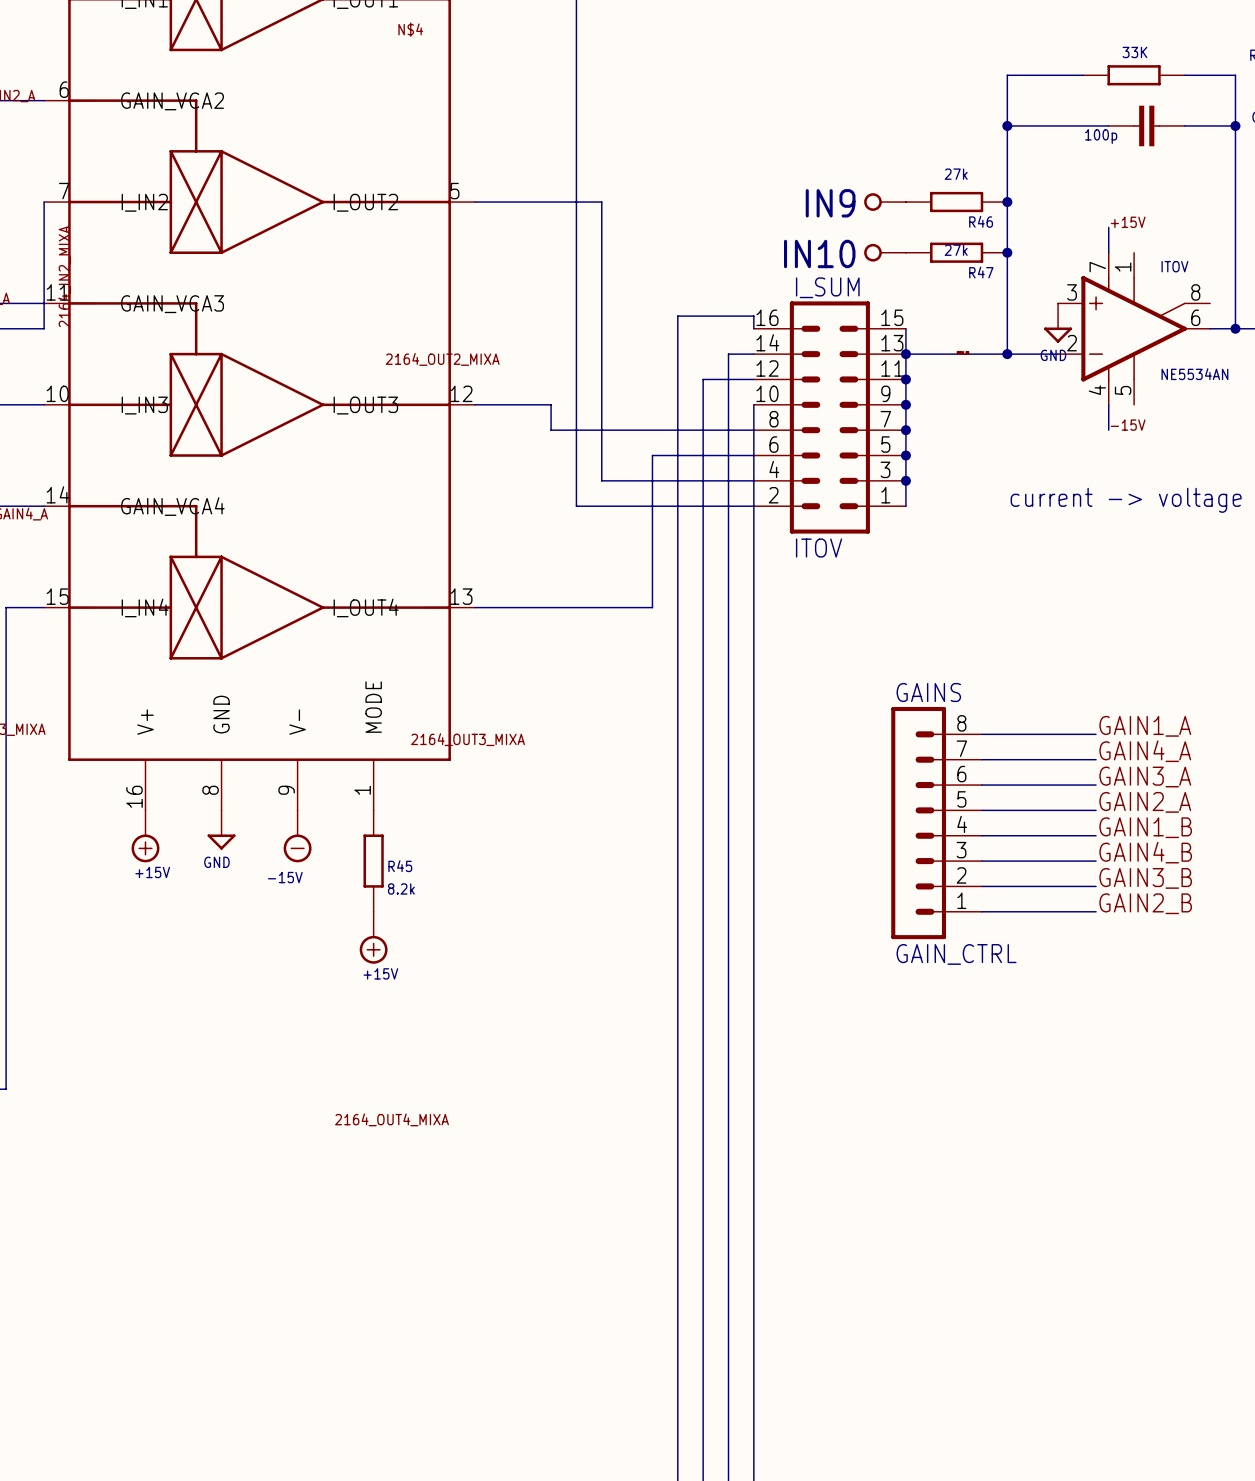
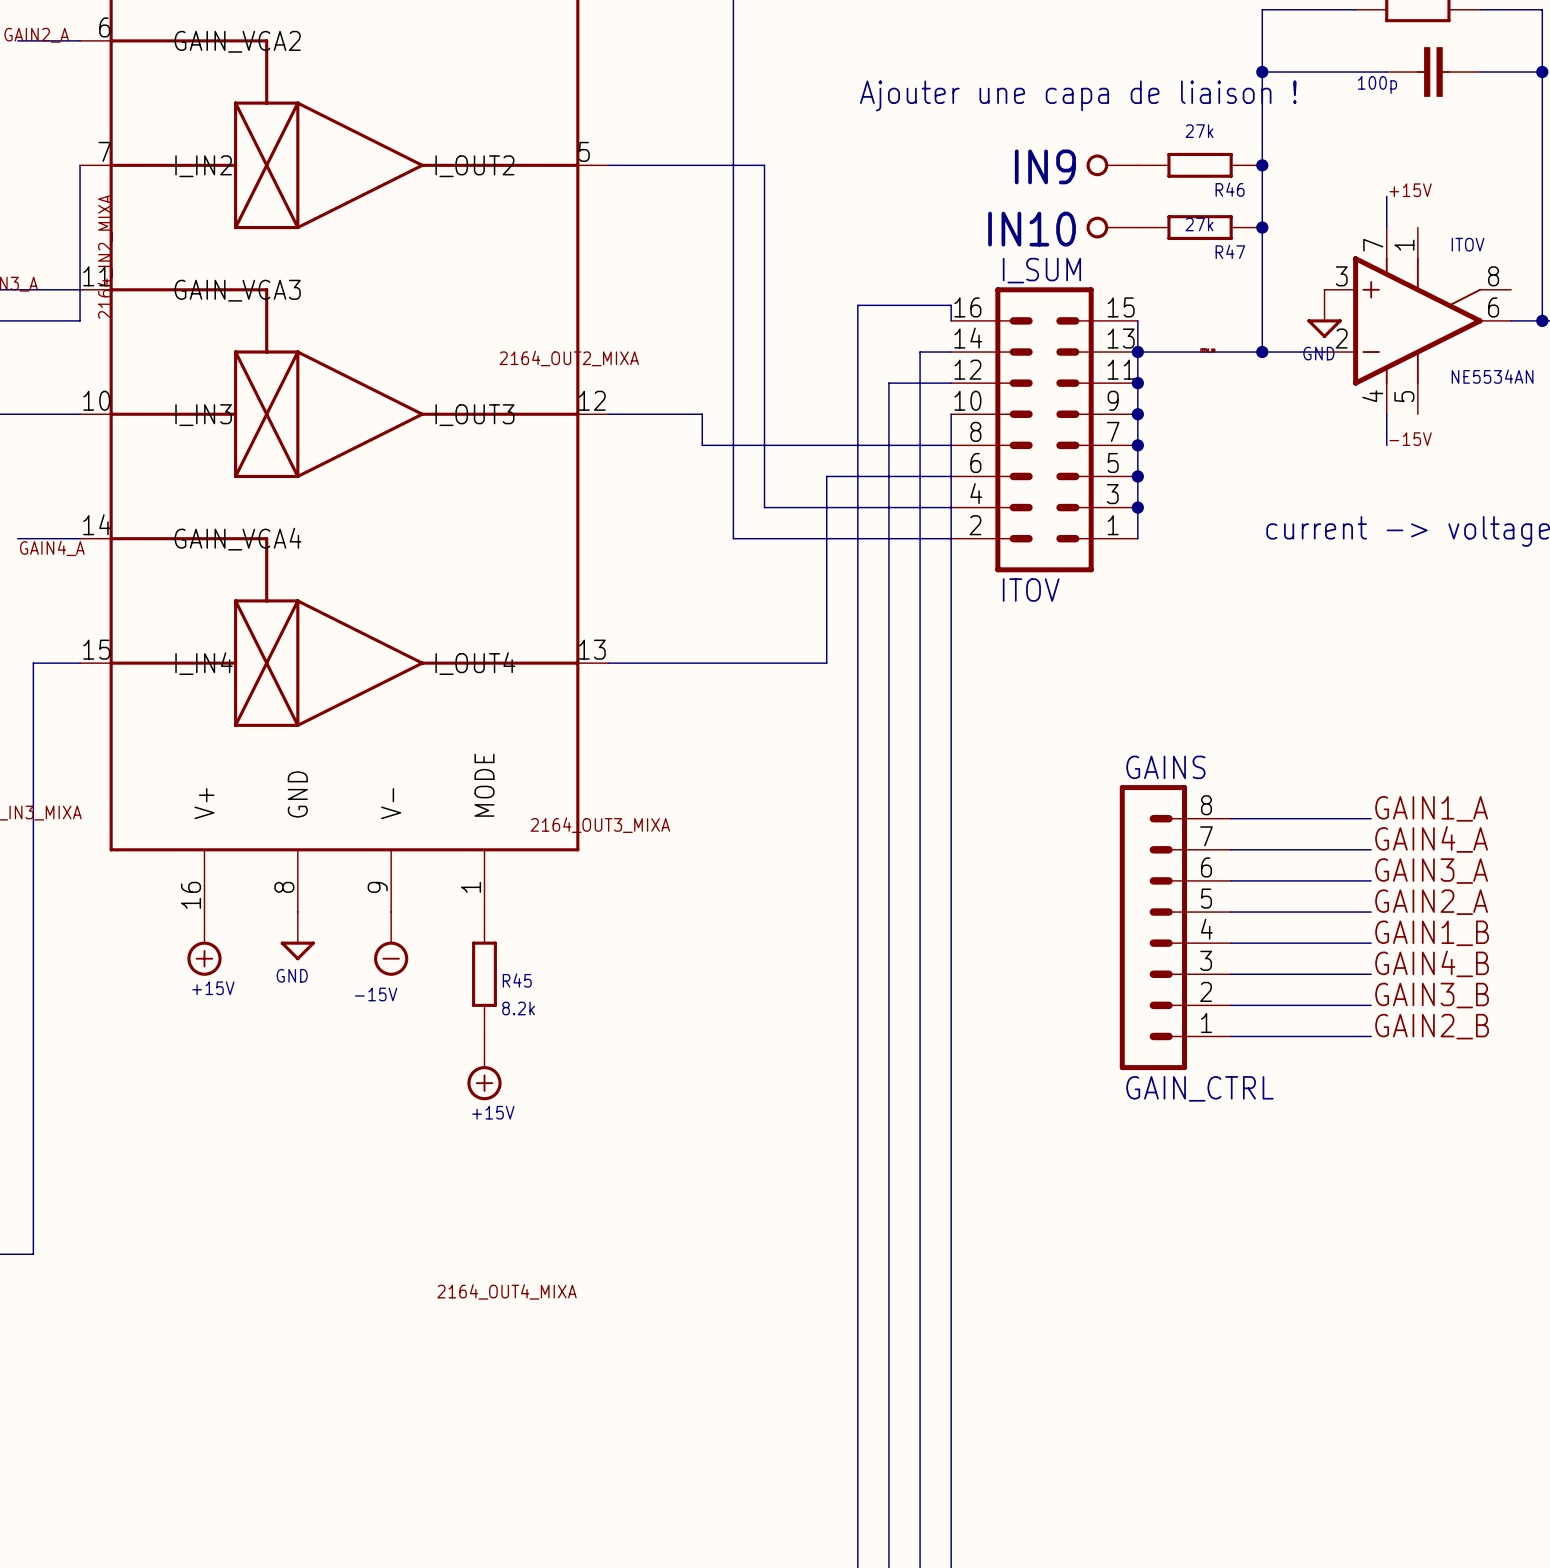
text: none -> Ajouter une capa de liaison ! (1078, 95)

